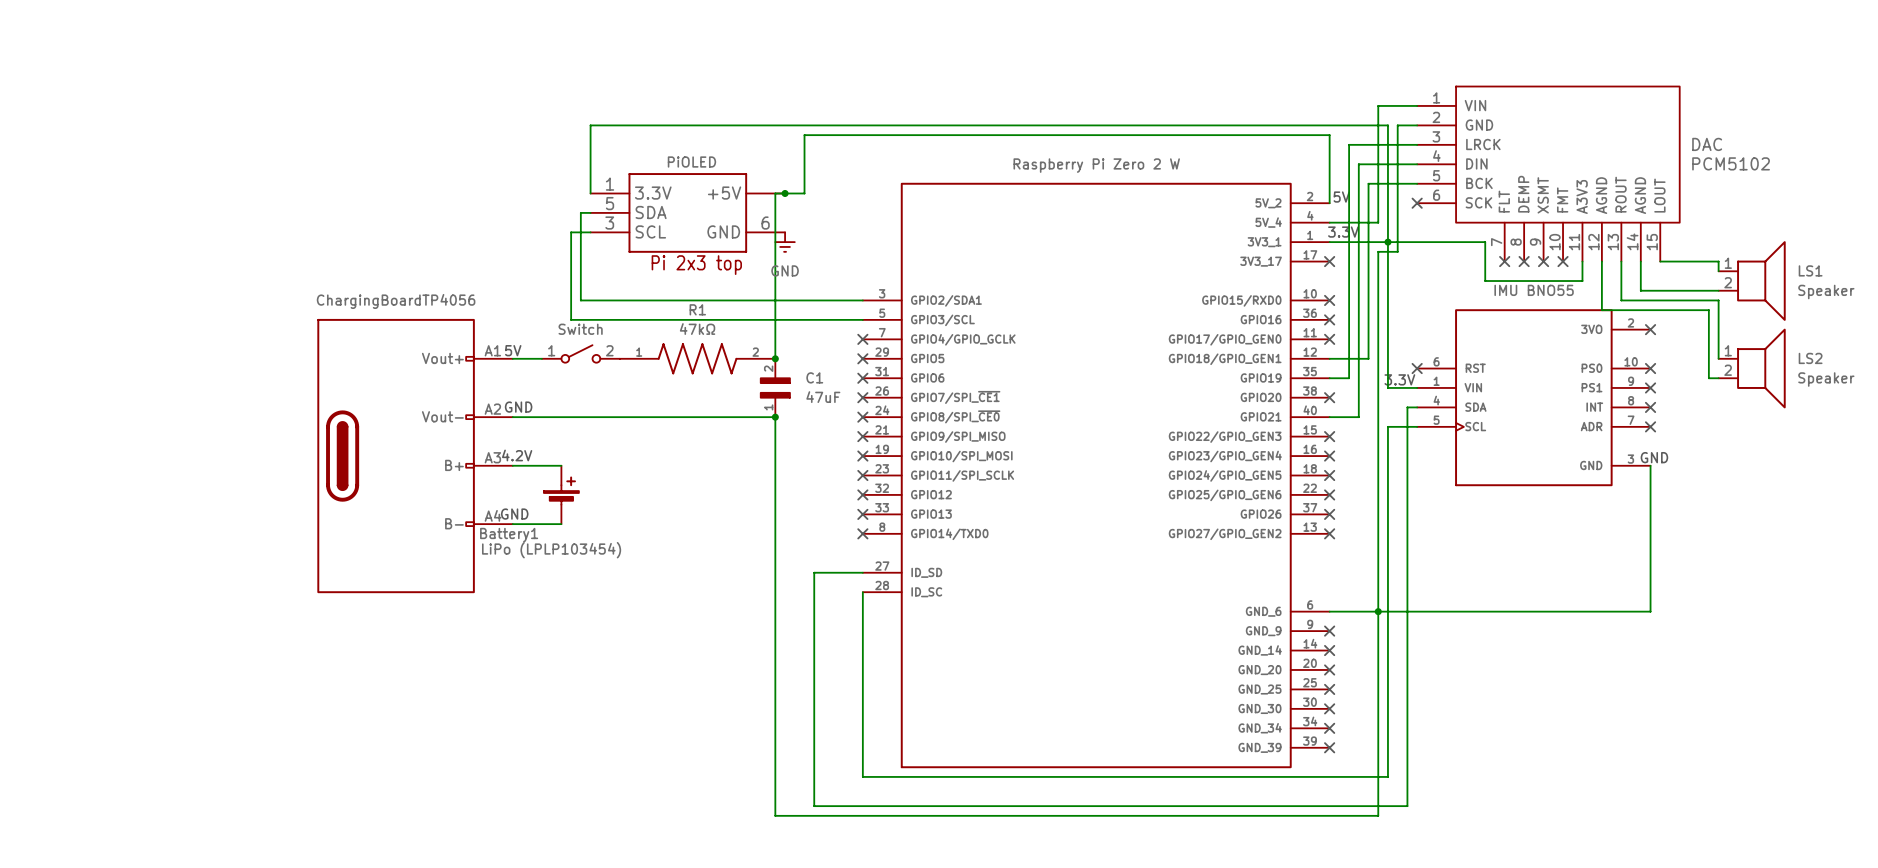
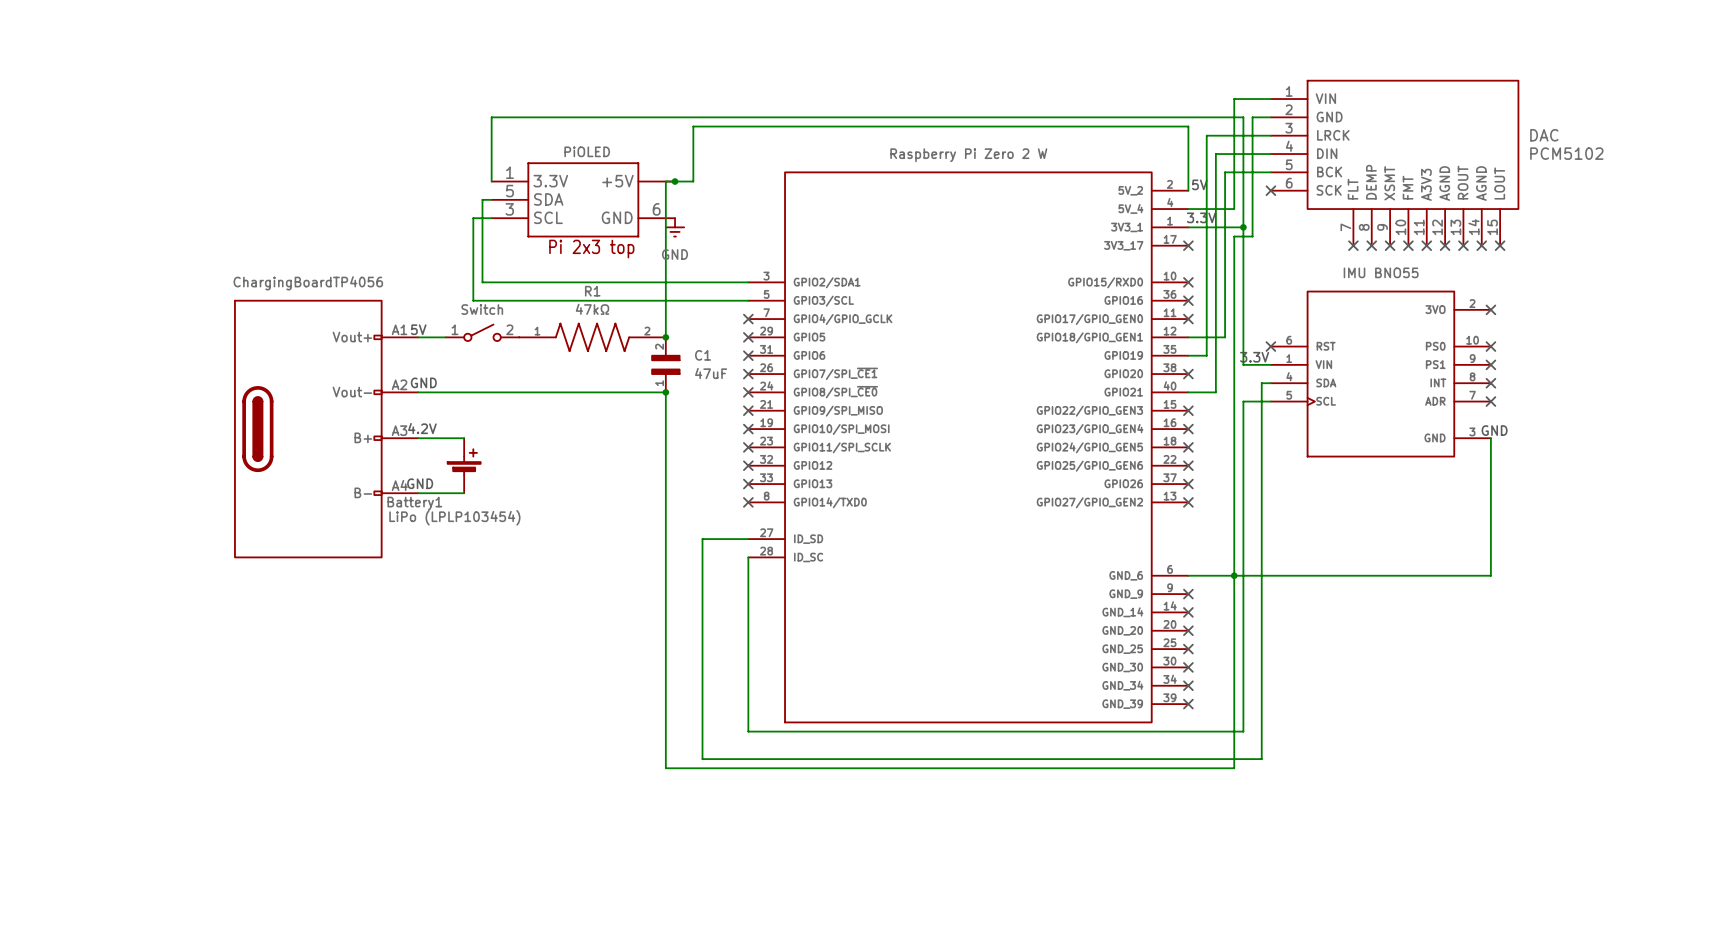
wire: (1387, 242) (1485, 242) (1485, 281) (1582, 281) (1582, 261) -> none
no-connect mark: none -> (1426, 245)
wire: (1601, 261) (1601, 310) (1708, 310) (1708, 378) (1718, 378) -> none
no-connect mark: none -> (1445, 245)
wire: (1621, 261) (1621, 300) (1718, 300) (1718, 358) -> none
no-connect mark: none -> (1463, 245)
wire: (1640, 261) (1640, 290) (1718, 290) -> none
no-connect mark: none -> (1481, 245)
wire: (1660, 261) (1718, 261) (1718, 271) -> none
no-connect mark: none -> (1500, 245)
LS1: Speaker (1752, 281) -> none
LS2: Speaker (1752, 368) -> none

